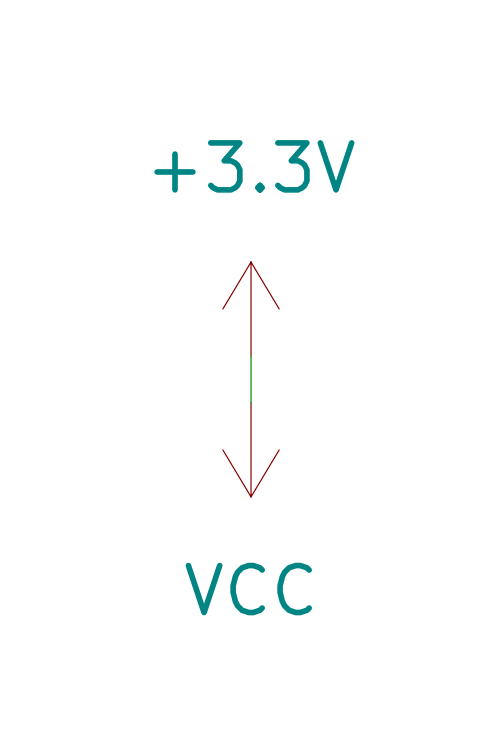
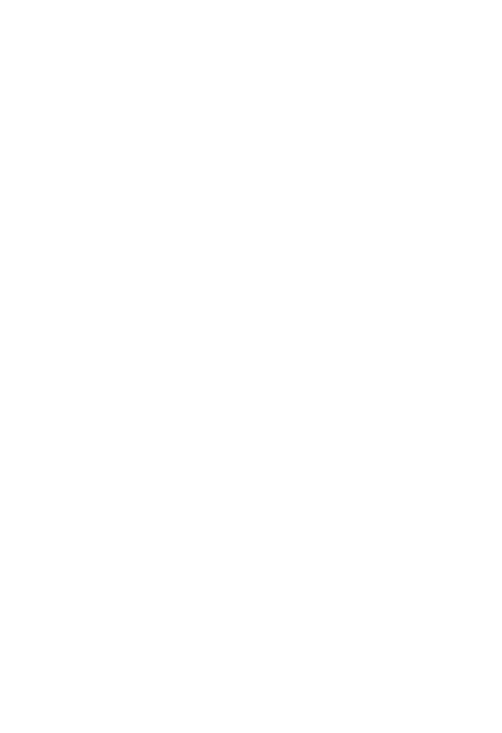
power symbol: +3.3V (251, 309) -> none
wire: (251, 355) (251, 402) -> none
power symbol: VCC (251, 449) -> none

